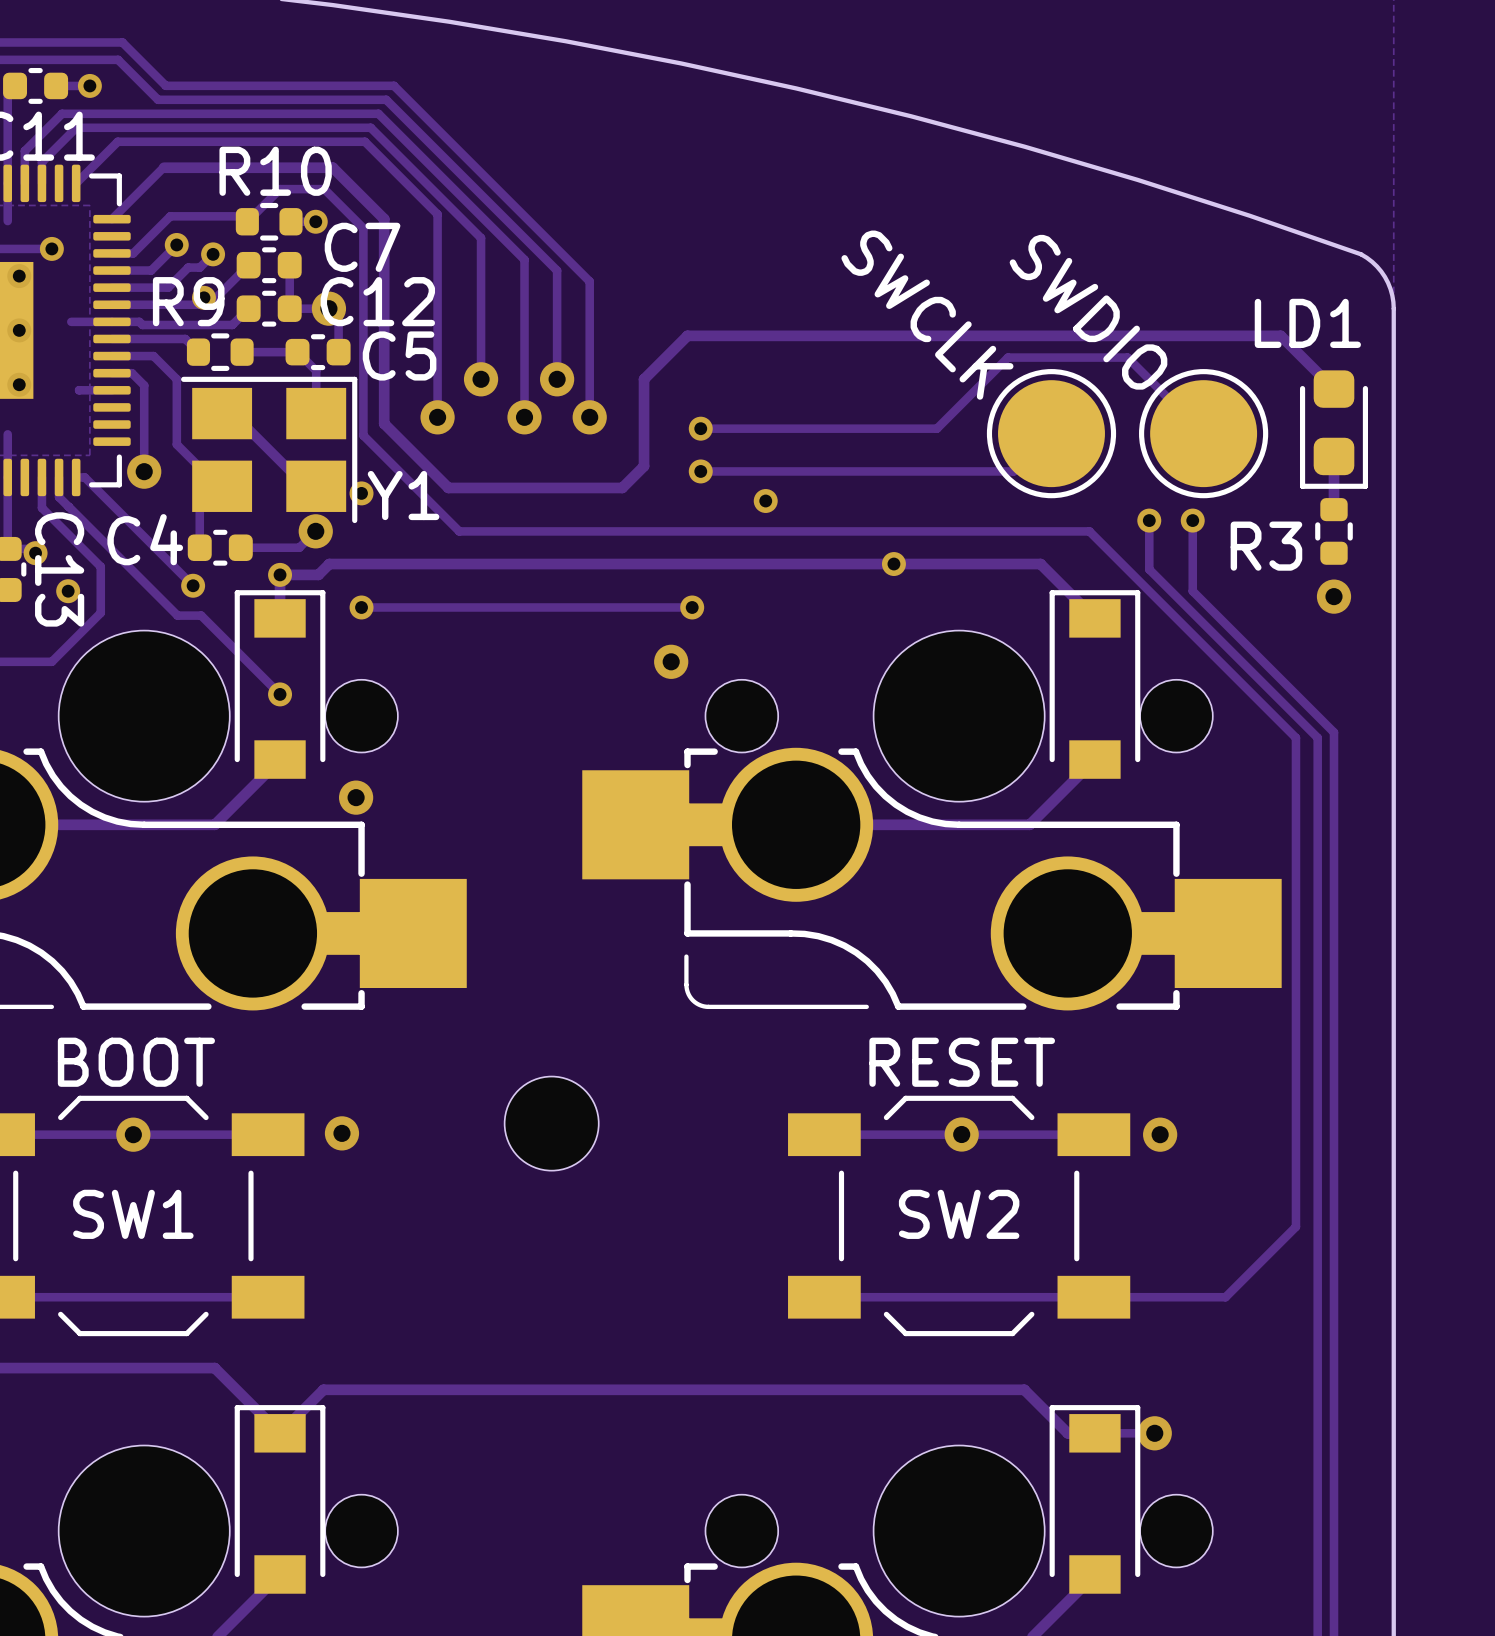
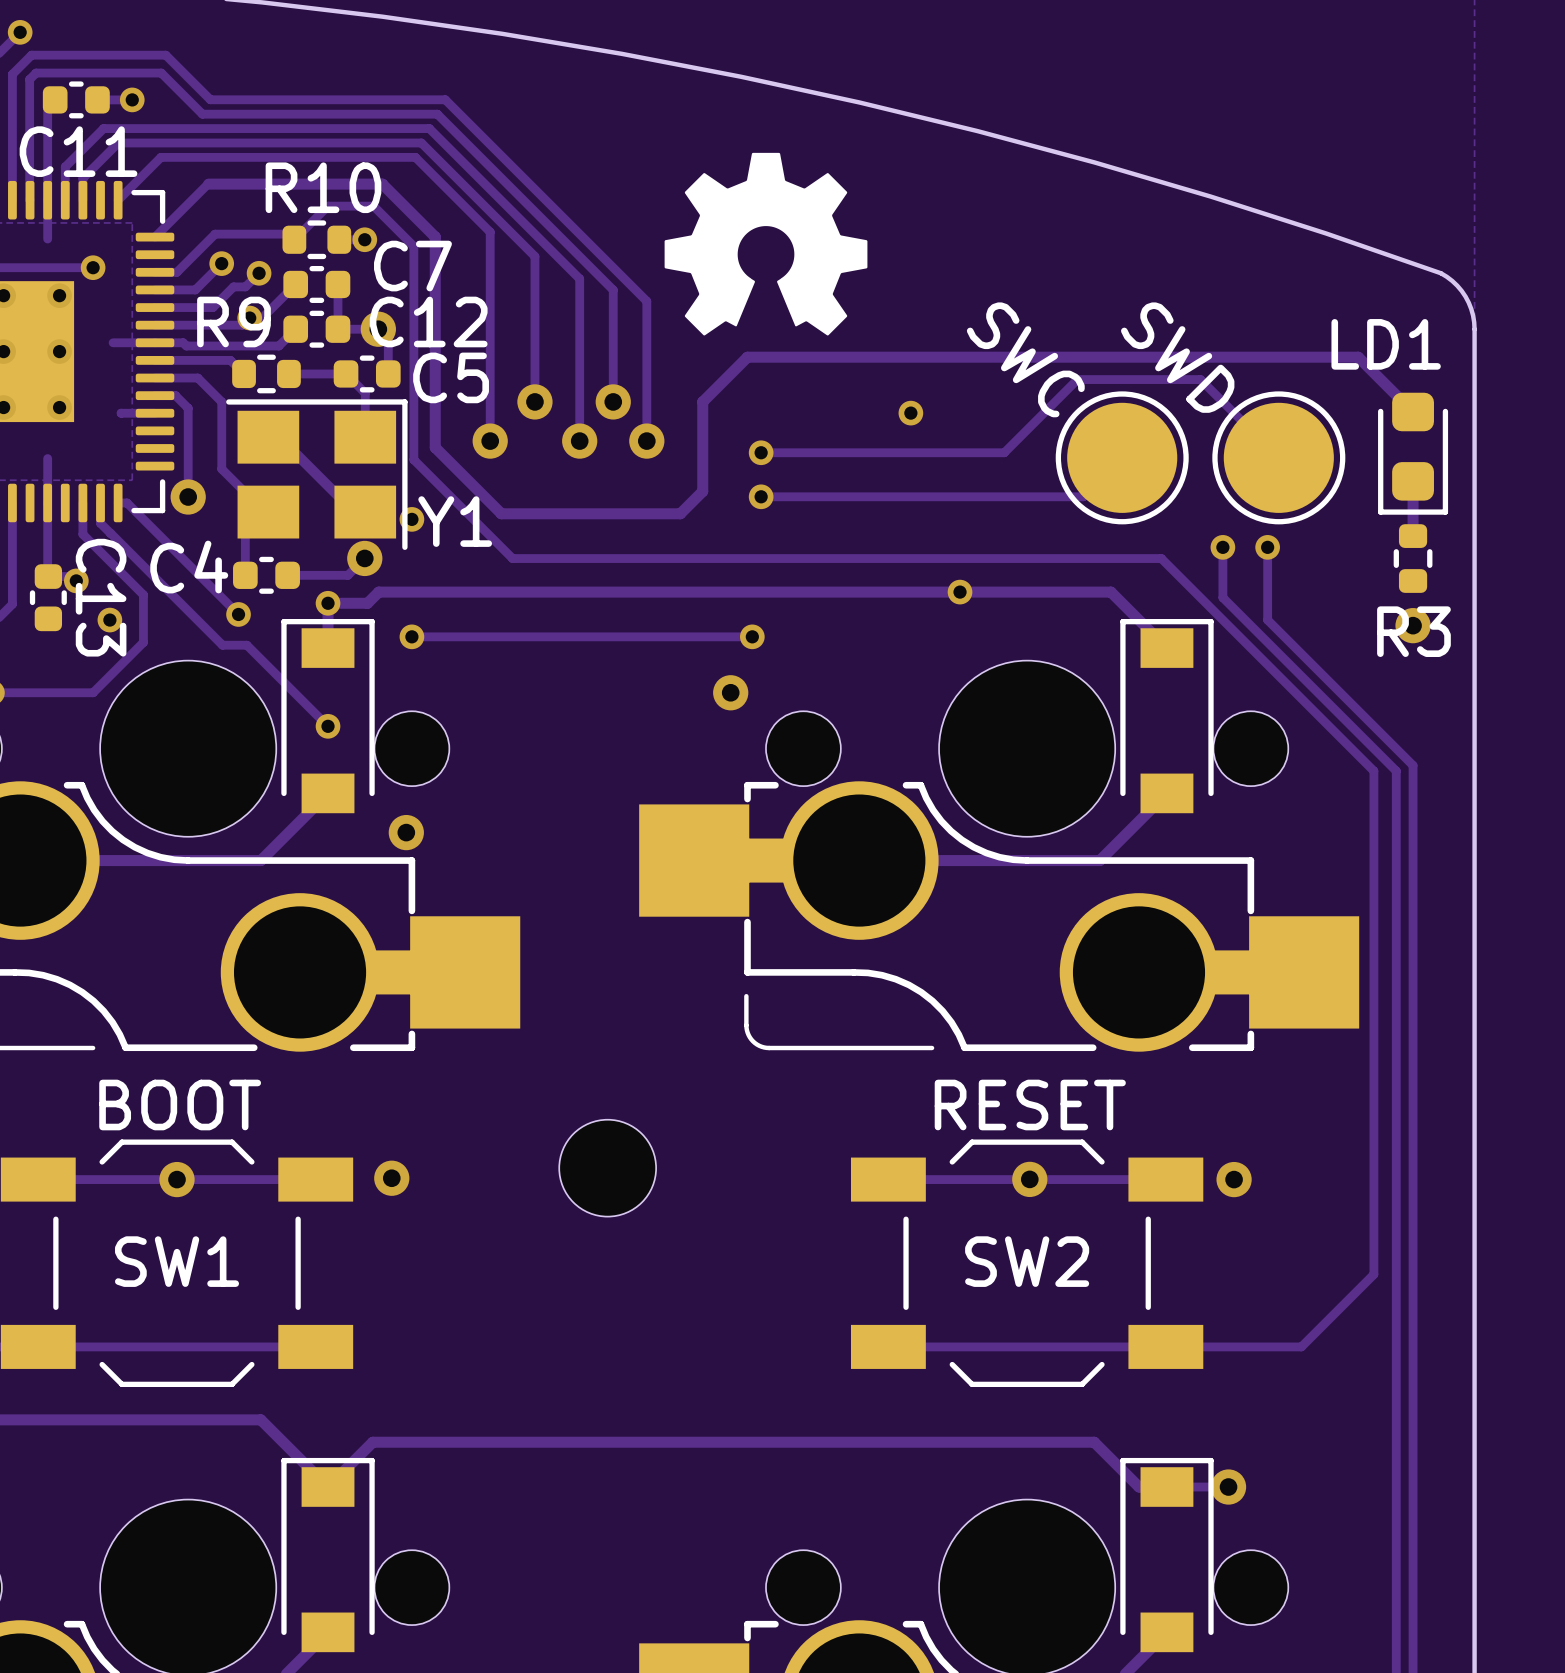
drawing: none -> [664, 152, 868, 336]
part text: SWDIO (1088, 312) -> none
part text: SWCLK (927, 315) -> none
part text: none -> SWD (1177, 357)
part text: none -> SWC (1025, 359)
via position: (765, 501) -> (910, 413)
R3 name position: R3 (1266, 546) -> R3 (1413, 631)

